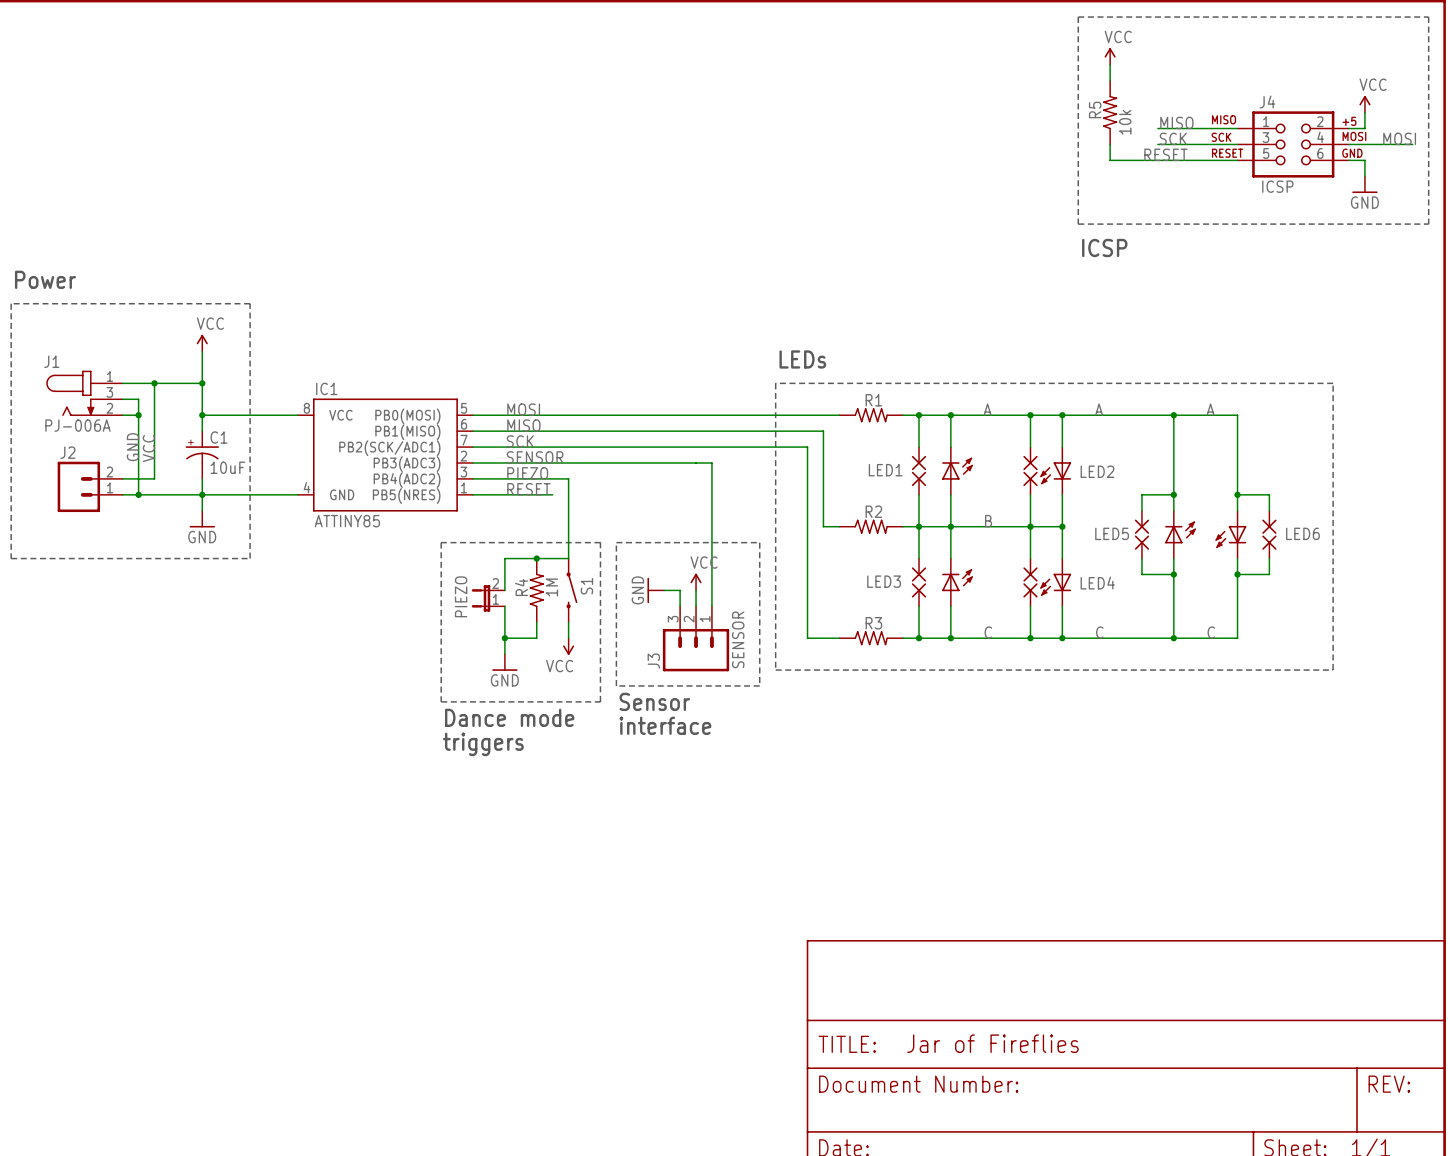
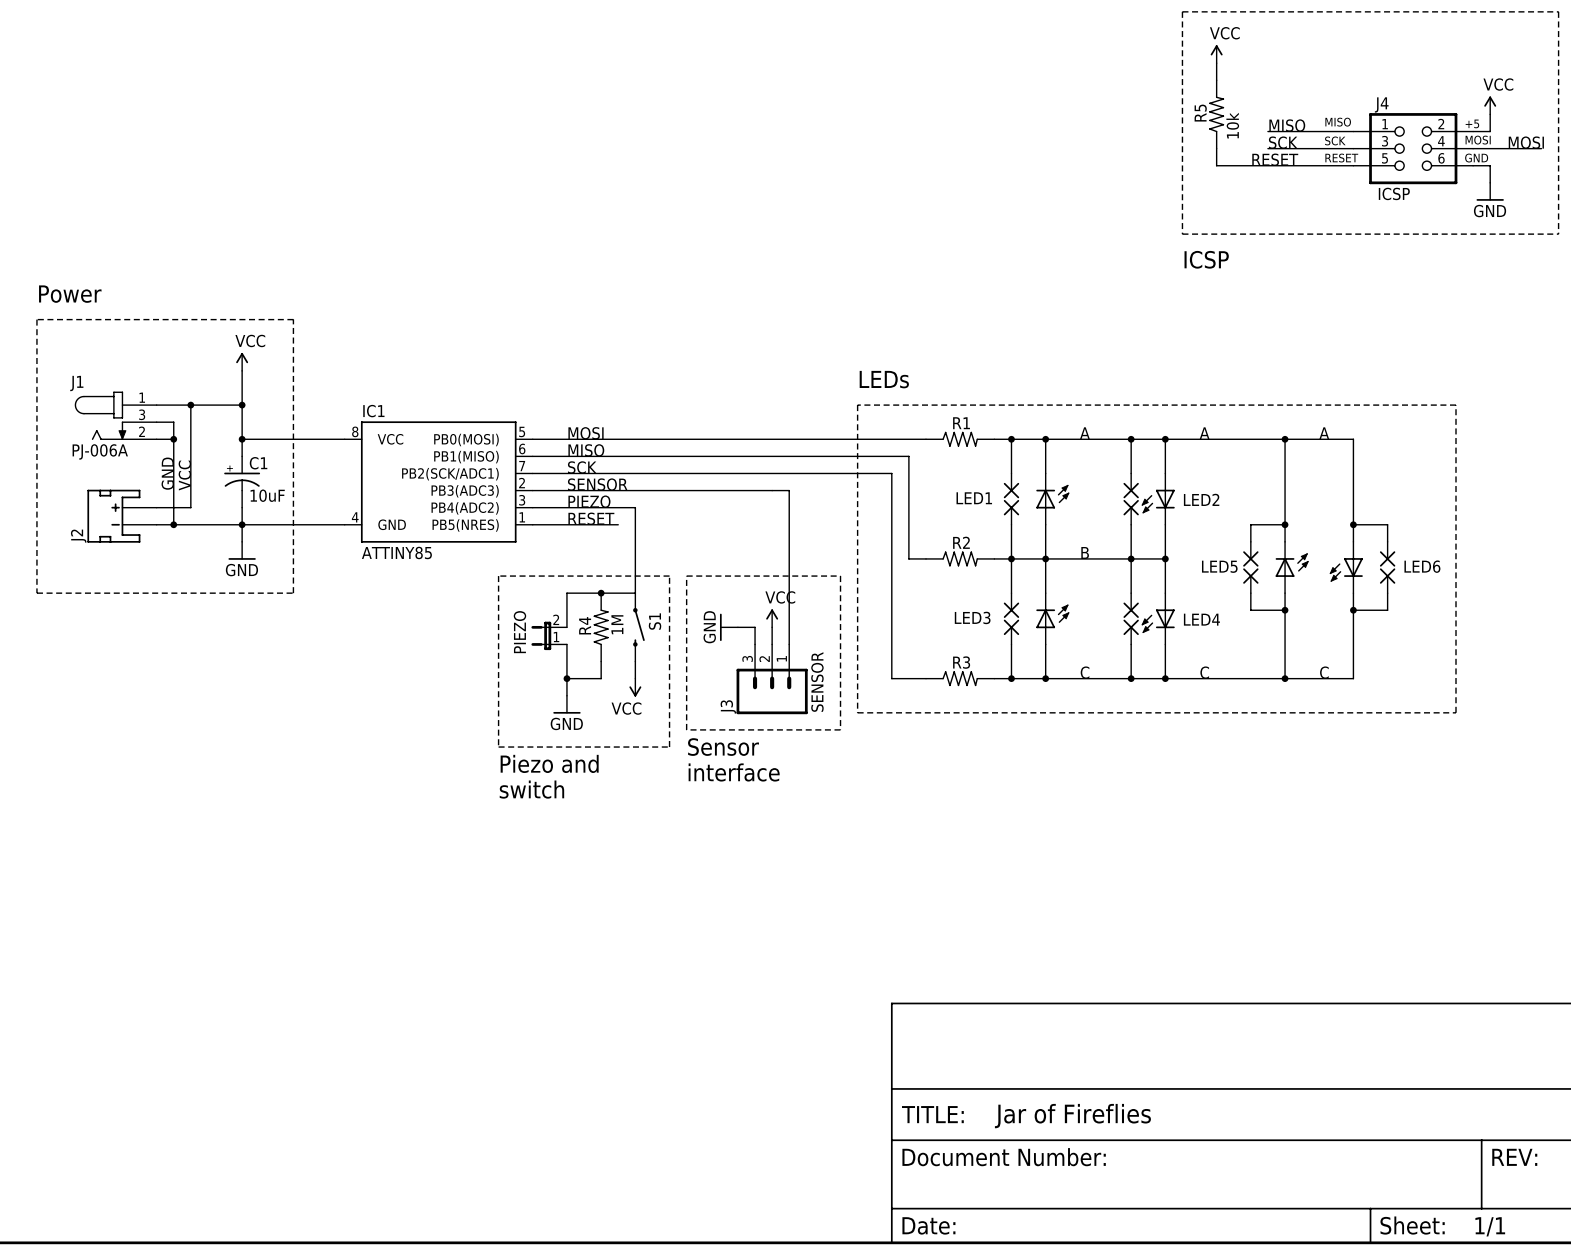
J2 name position: J2 (67, 452) -> J2 (78, 536)
J2 symbol: [57, 461, 123, 513] -> [87, 489, 157, 543]
text: Dance mode (509, 717) -> Piezo and (549, 763)
text: triggers (483, 744) -> switch (531, 789)

